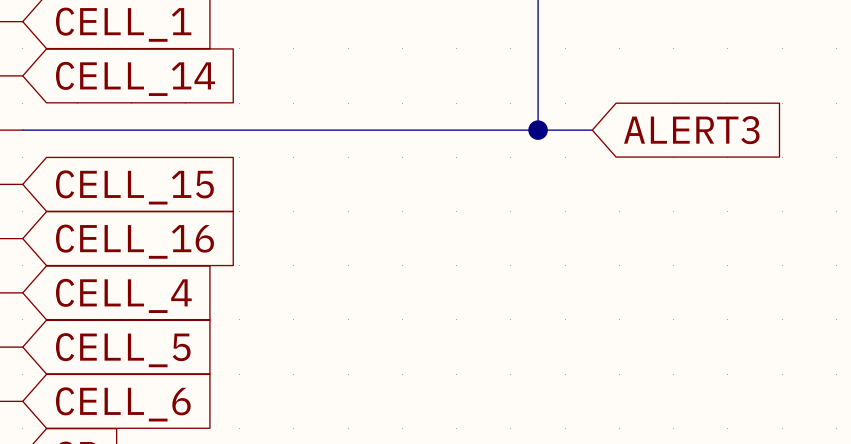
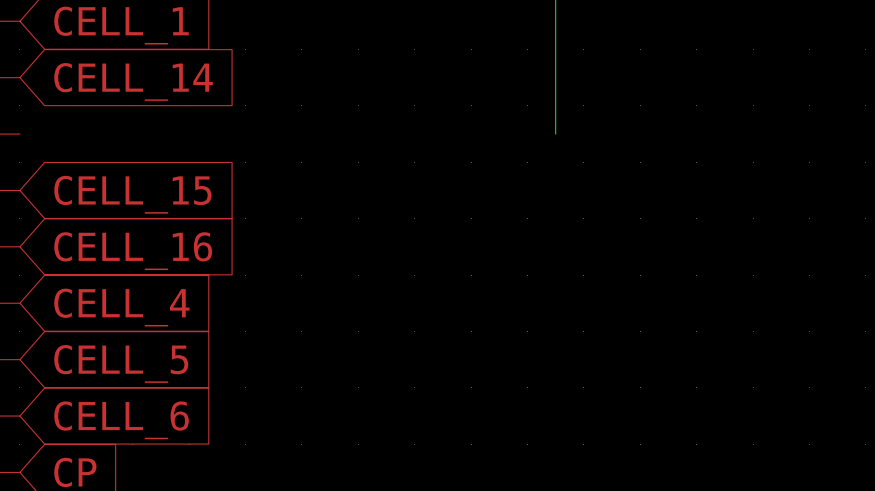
wire: (22, 130) (592, 130) -> none
junction: (538, 130) -> none
global label: ALERT3 (691, 130) -> none

